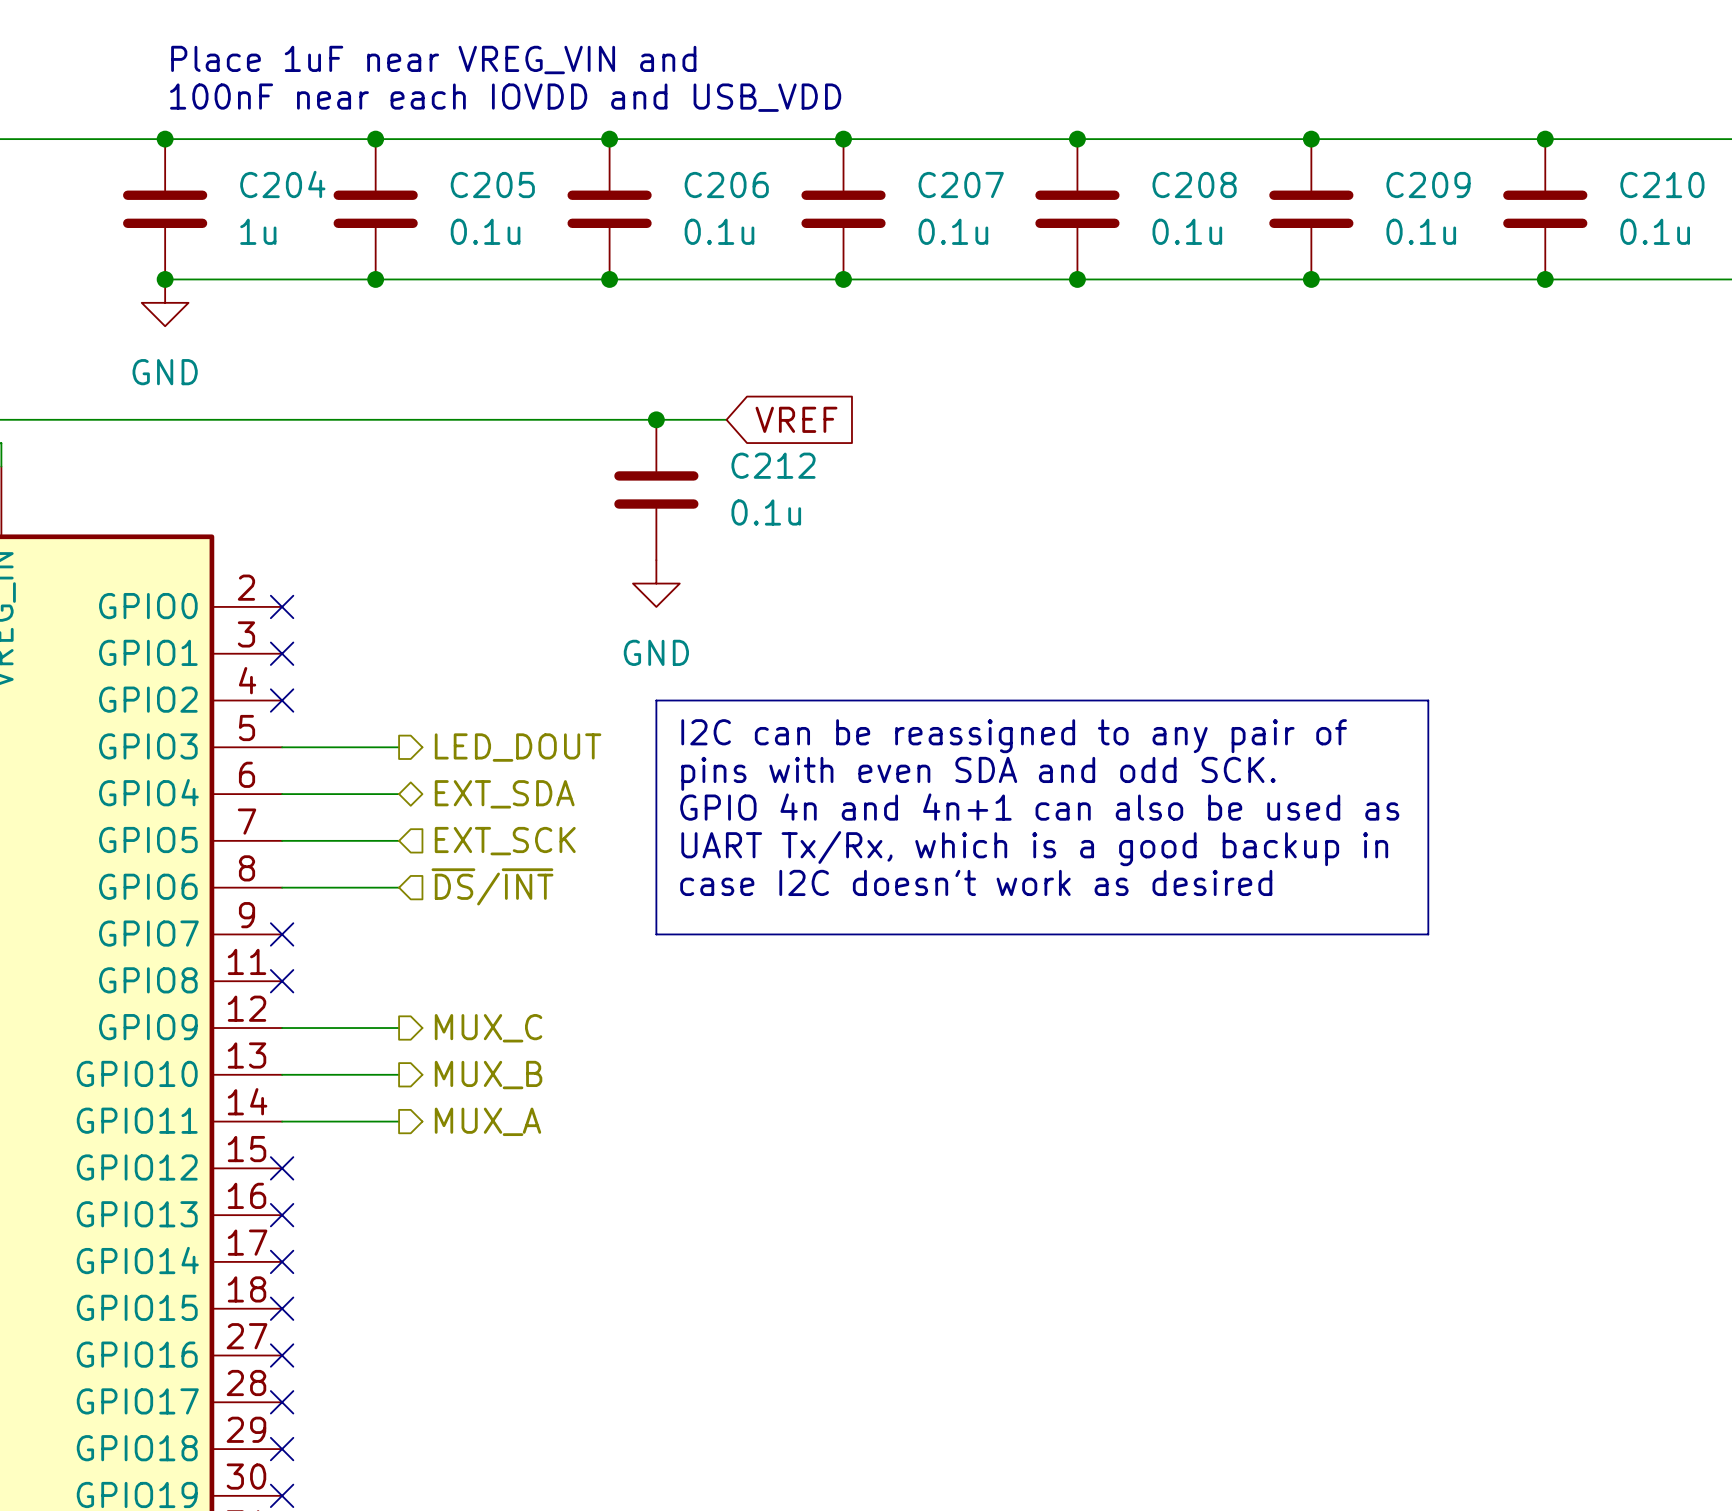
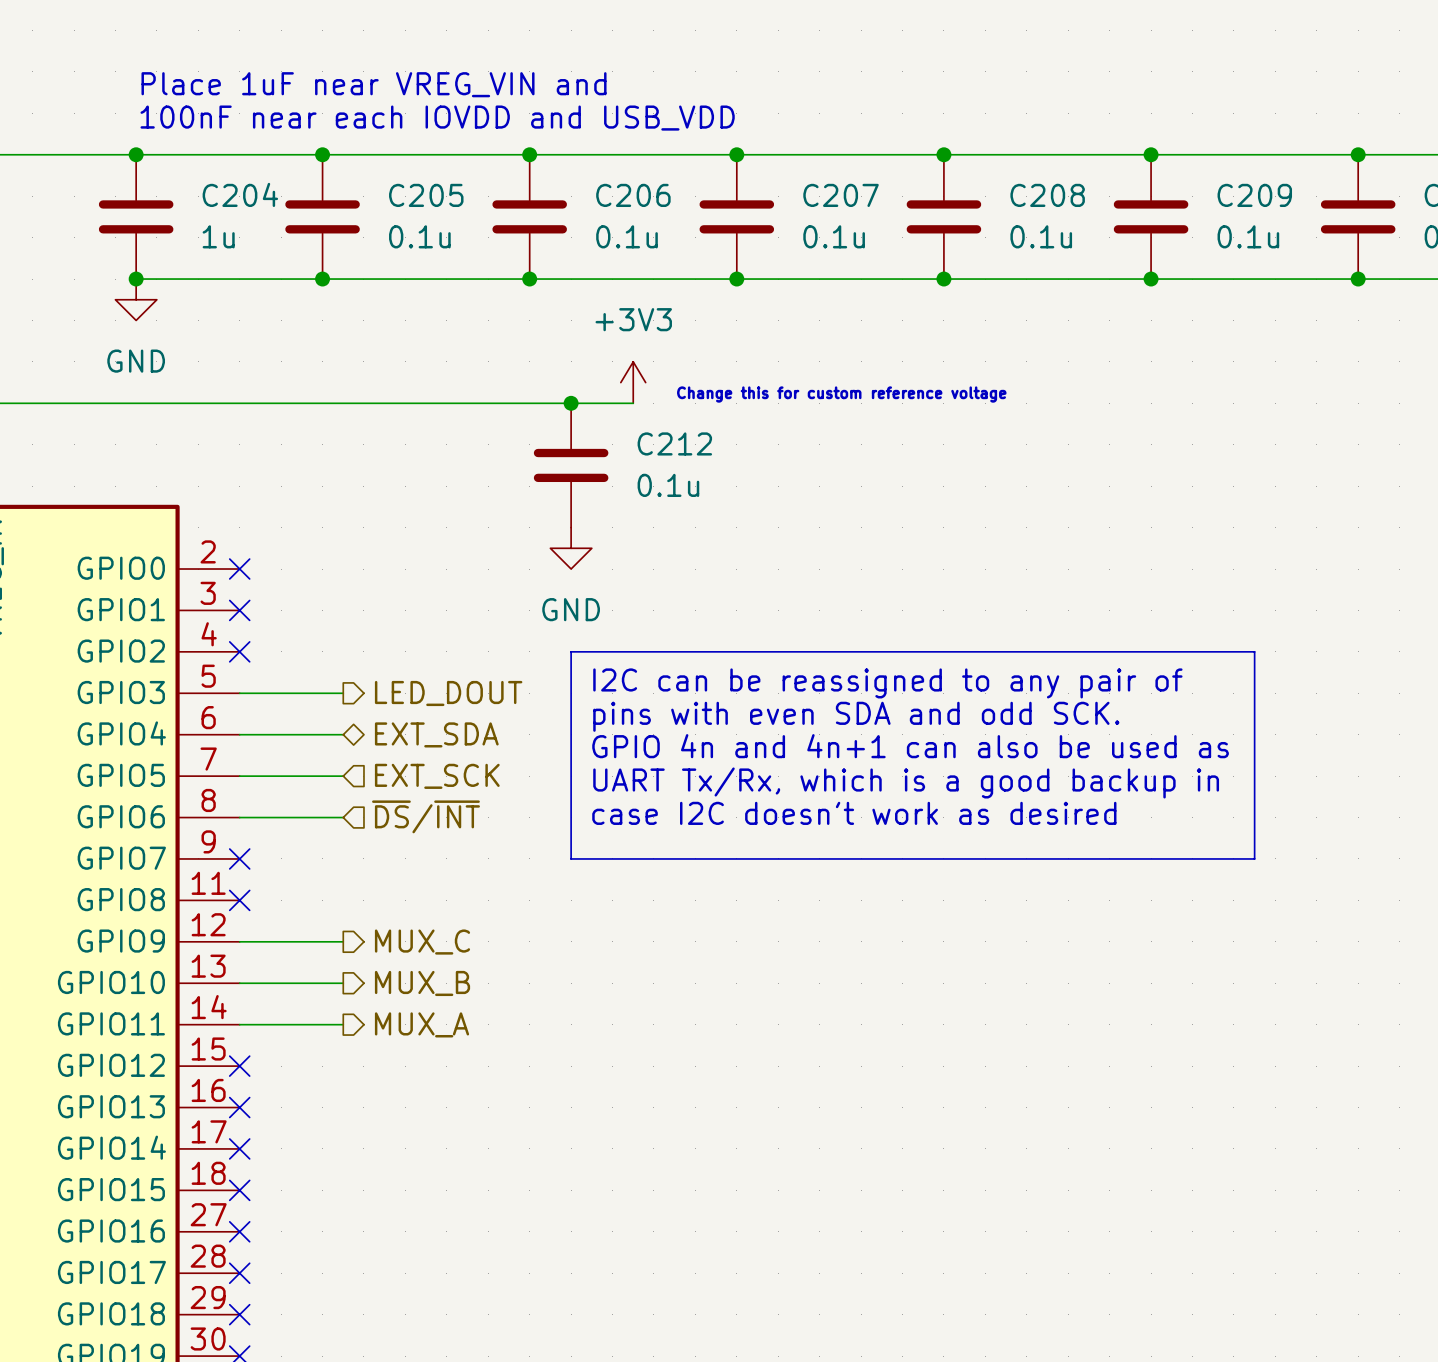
power symbol: none -> +3V3 (633, 382)
text: none -> Change this for custom reference voltage (841, 394)
global label: VREF (796, 419) -> none

